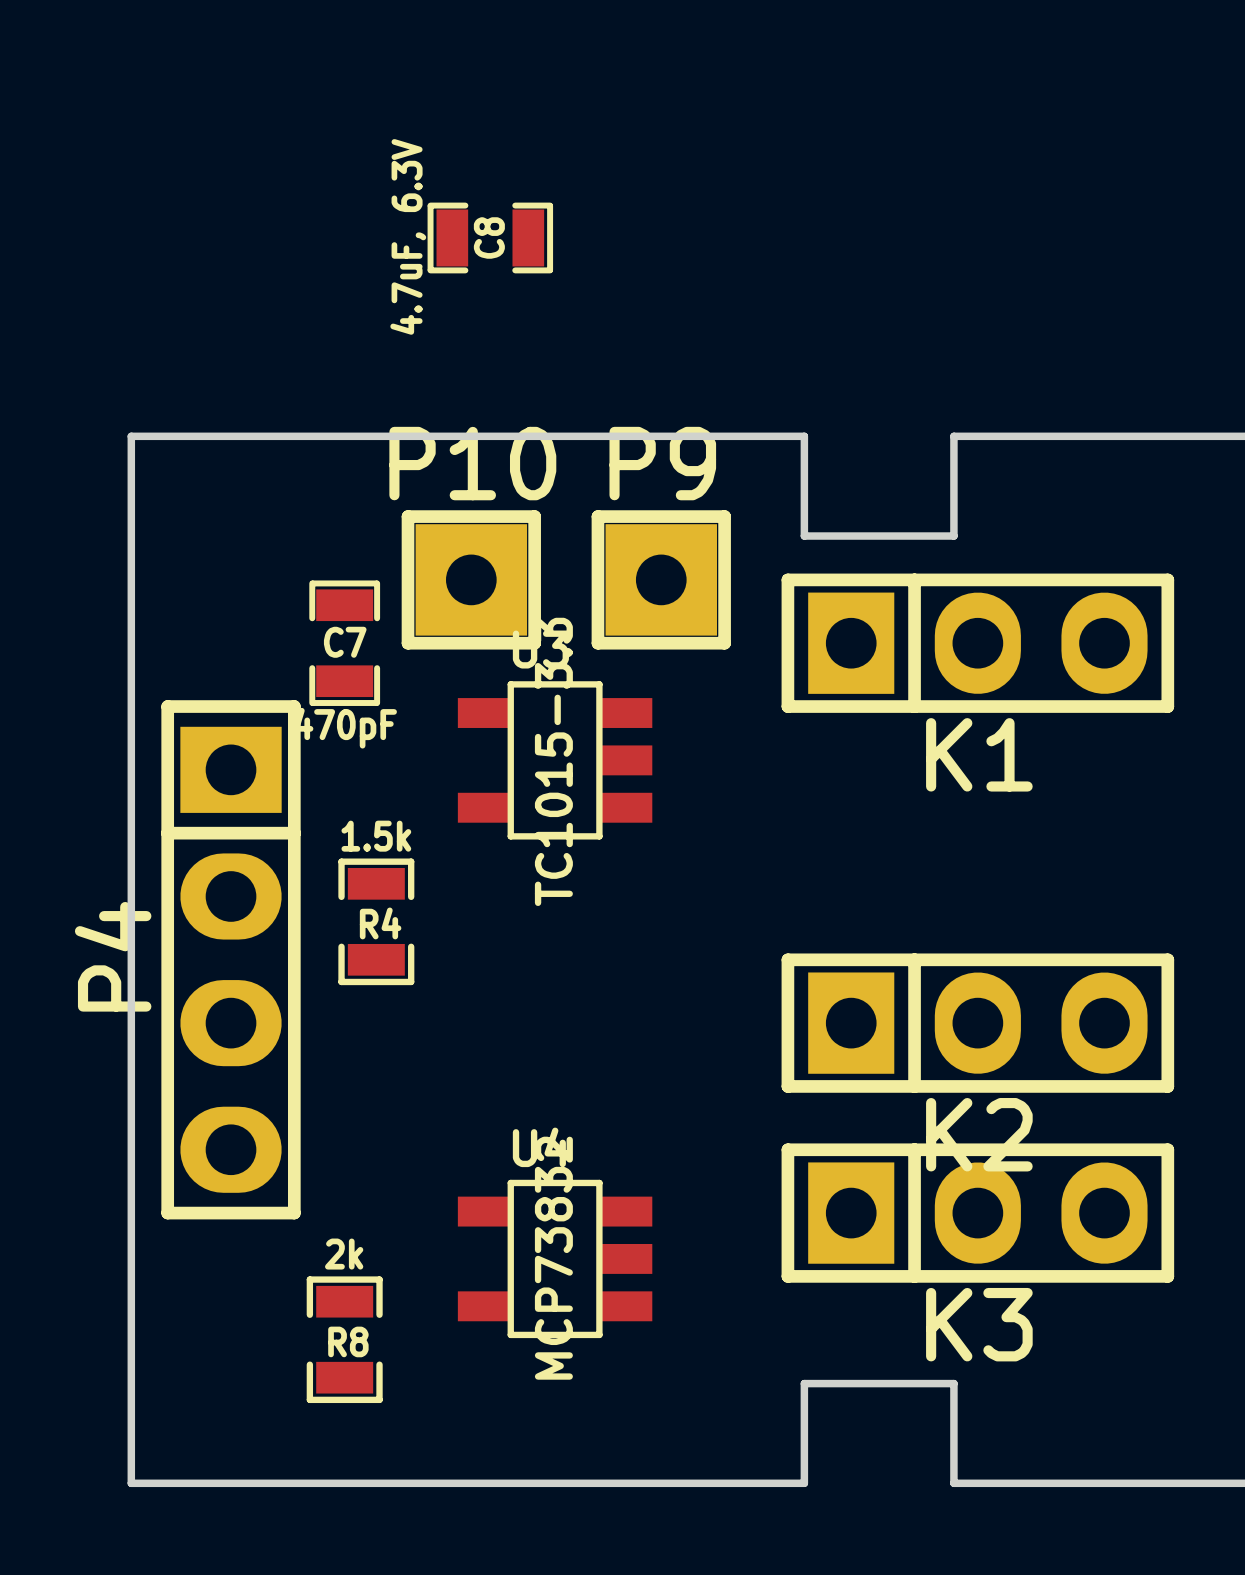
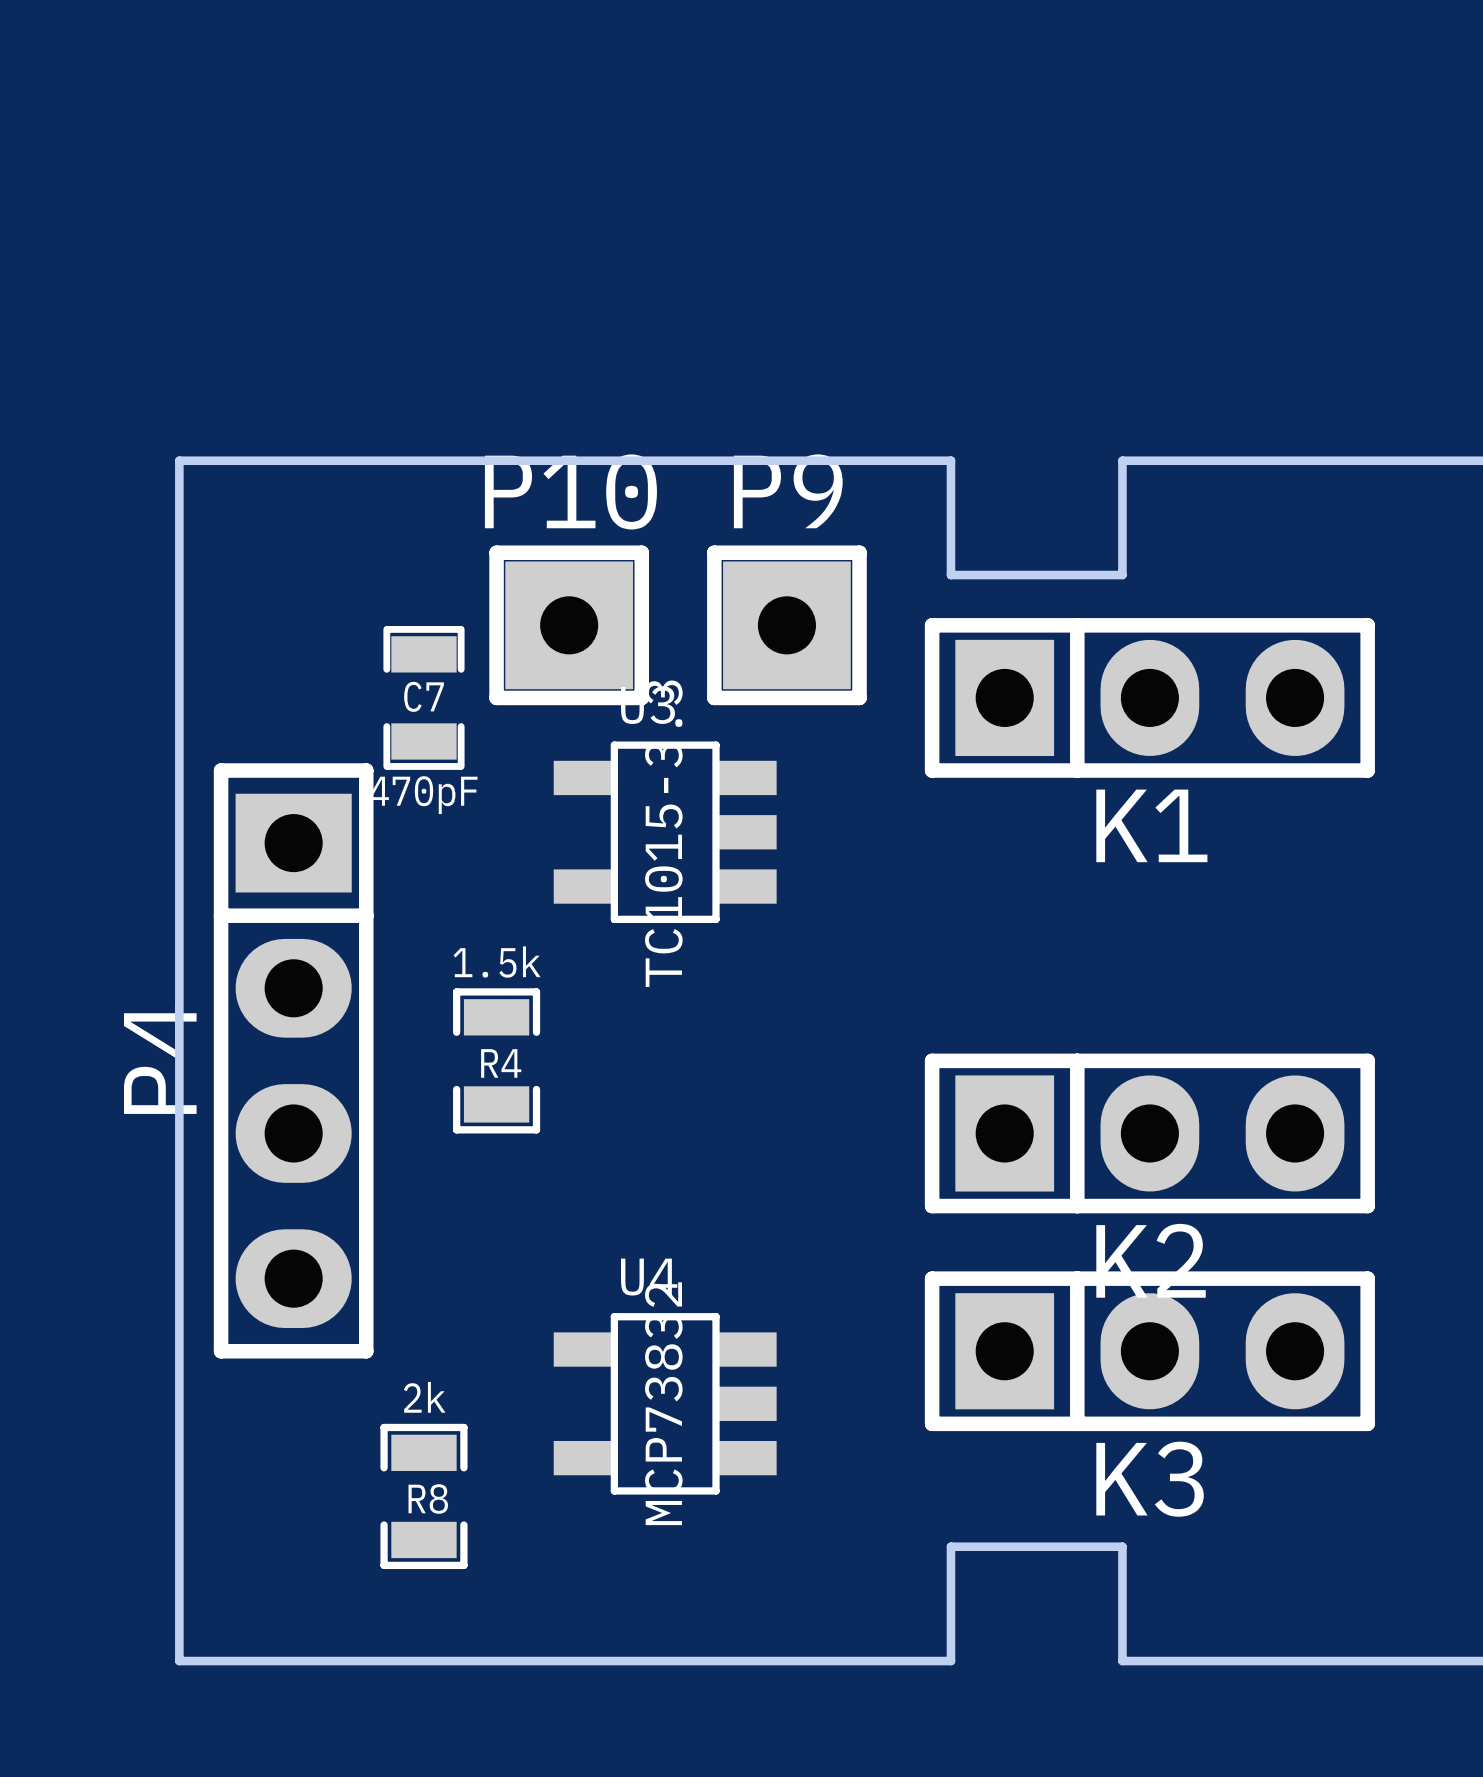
C8: 4.7uF, 6.3V (490, 237) -> none
R4 position: (376, 921) -> (496, 1060)

